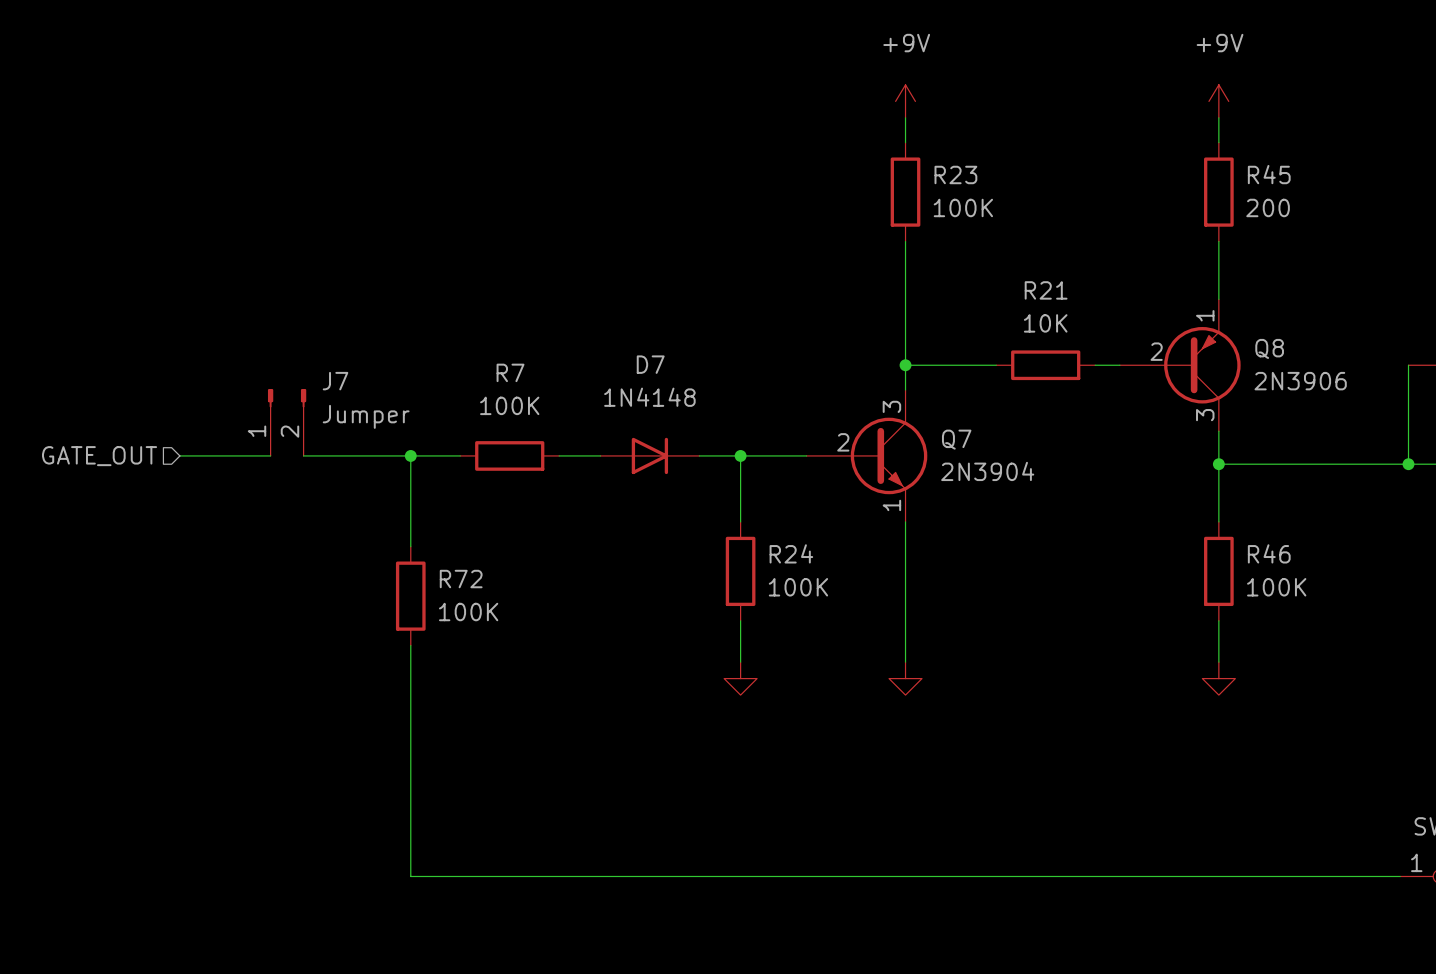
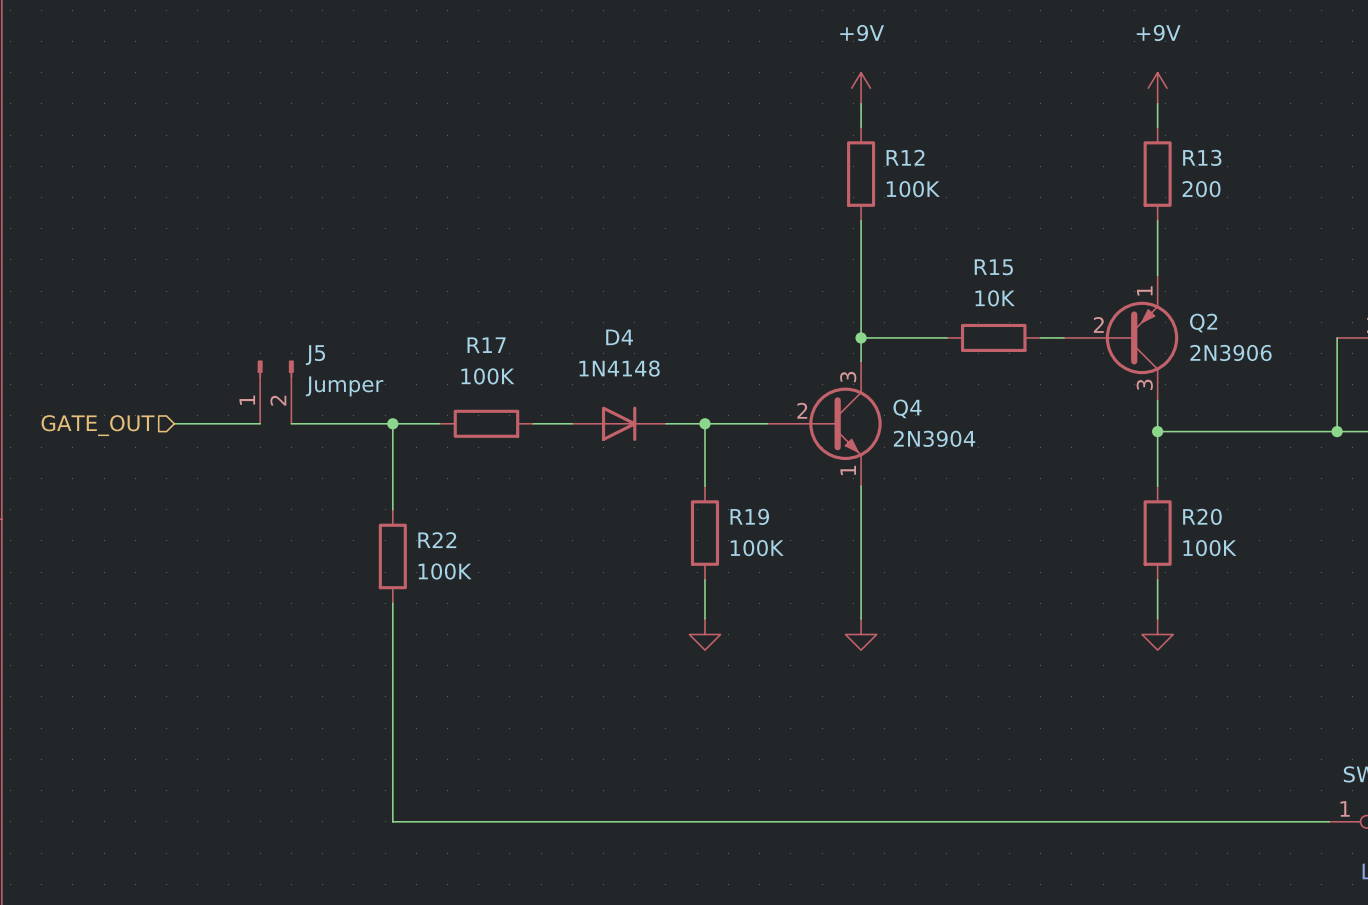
R23 name: R23 (955, 174) -> R12 (905, 157)
R45 name: R45 (1269, 174) -> R13 (1202, 157)
R21 name: R21 (1046, 290) -> R15 (993, 267)
Q8 name: Q8 (1269, 348) -> Q2 (1203, 323)
D7 name: D7 (650, 364) -> D4 (619, 337)
R7 name: R7 (510, 372) -> R17 (486, 345)
J7 name: J7 (335, 381) -> J5 (315, 355)
Q7 name: Q7 (956, 439) -> Q4 (907, 408)
R24 name: R24 (791, 553) -> R19 (749, 516)
R46 name: R46 (1269, 553) -> R20 (1202, 516)
R72 name: R72 (461, 579) -> R22 (437, 540)

